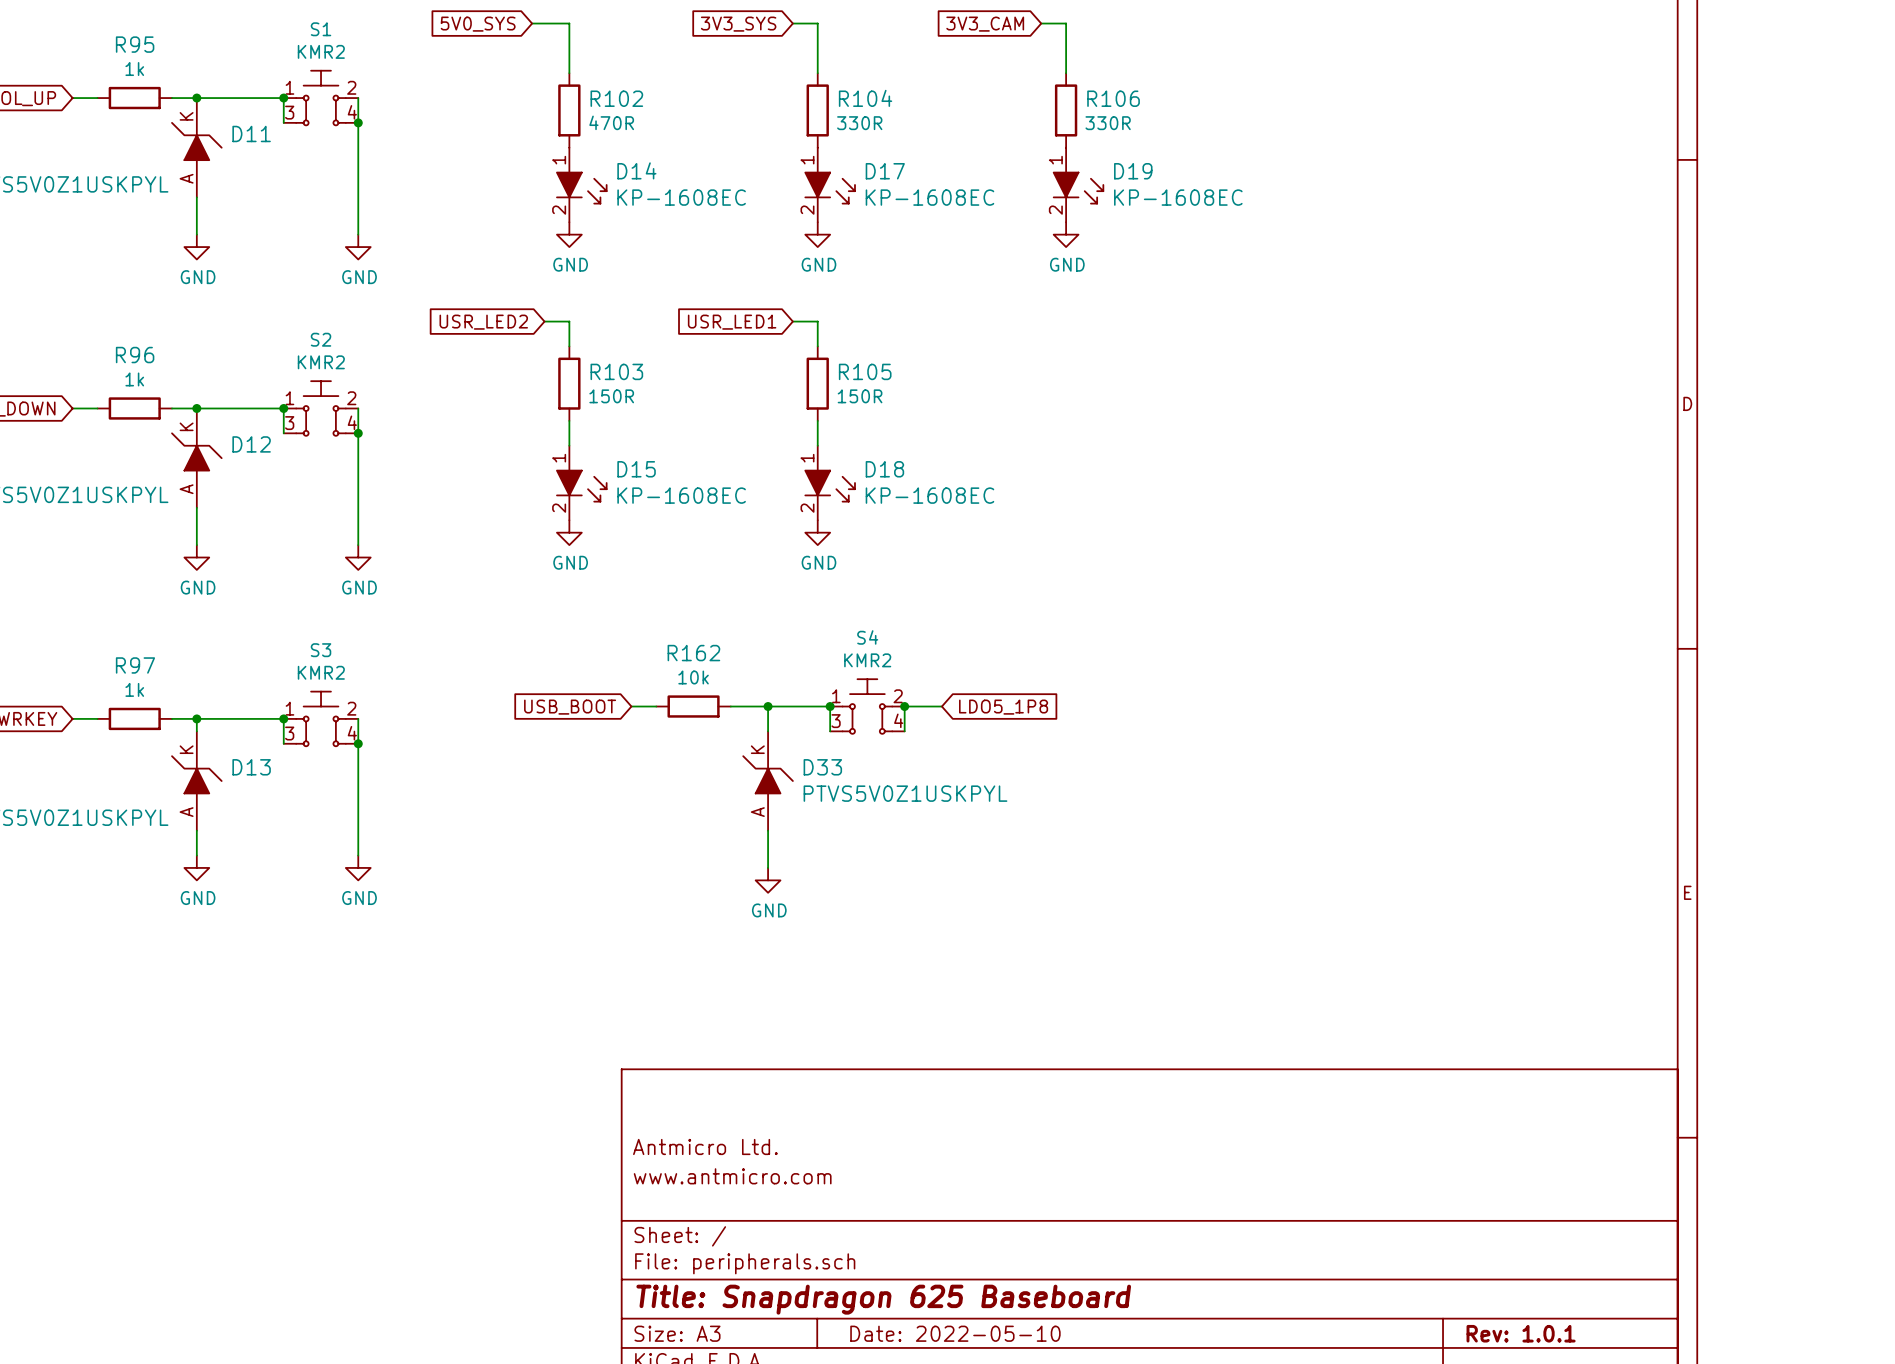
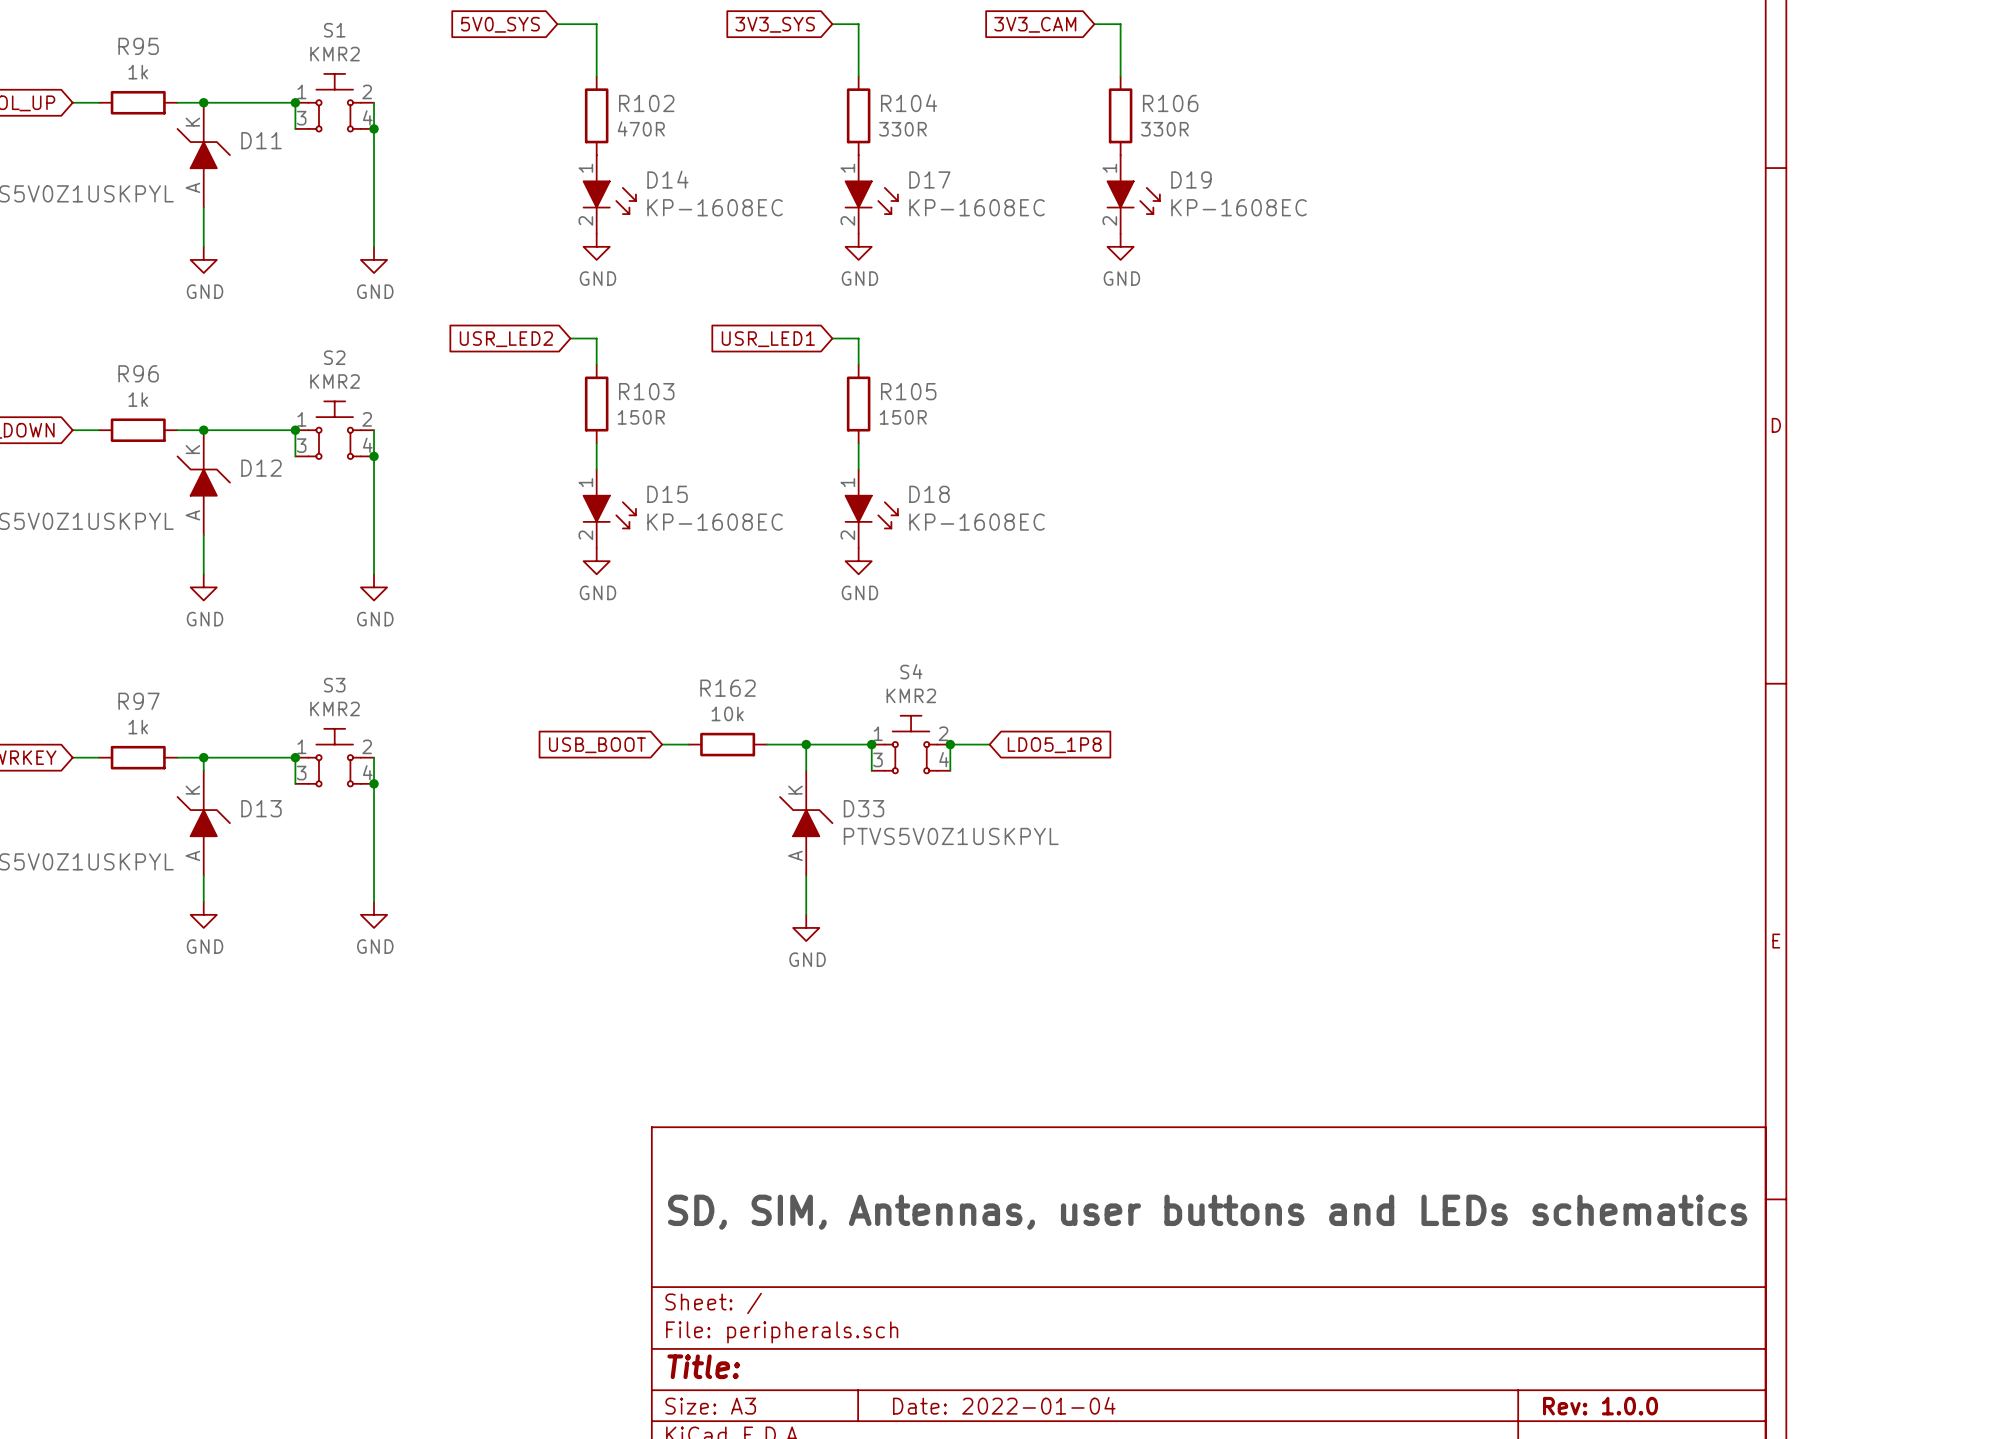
title block: Antmicro Ltd. (705, 1146) -> none
text: none -> SD, SIM, Antennas, user buttons and LEDs schematics (1207, 1212)
title block: www.antmicro.com (732, 1176) -> none
title block: Title: Snapdragon 625 Baseboard (883, 1299) -> Title: (703, 1366)
title block: Date: 2022-05-10 (955, 1333) -> Date: 2022-01-04 (1004, 1405)
title block: Rev: 1.0.1 (1521, 1333) -> Rev: 1.0.0 (1600, 1406)

